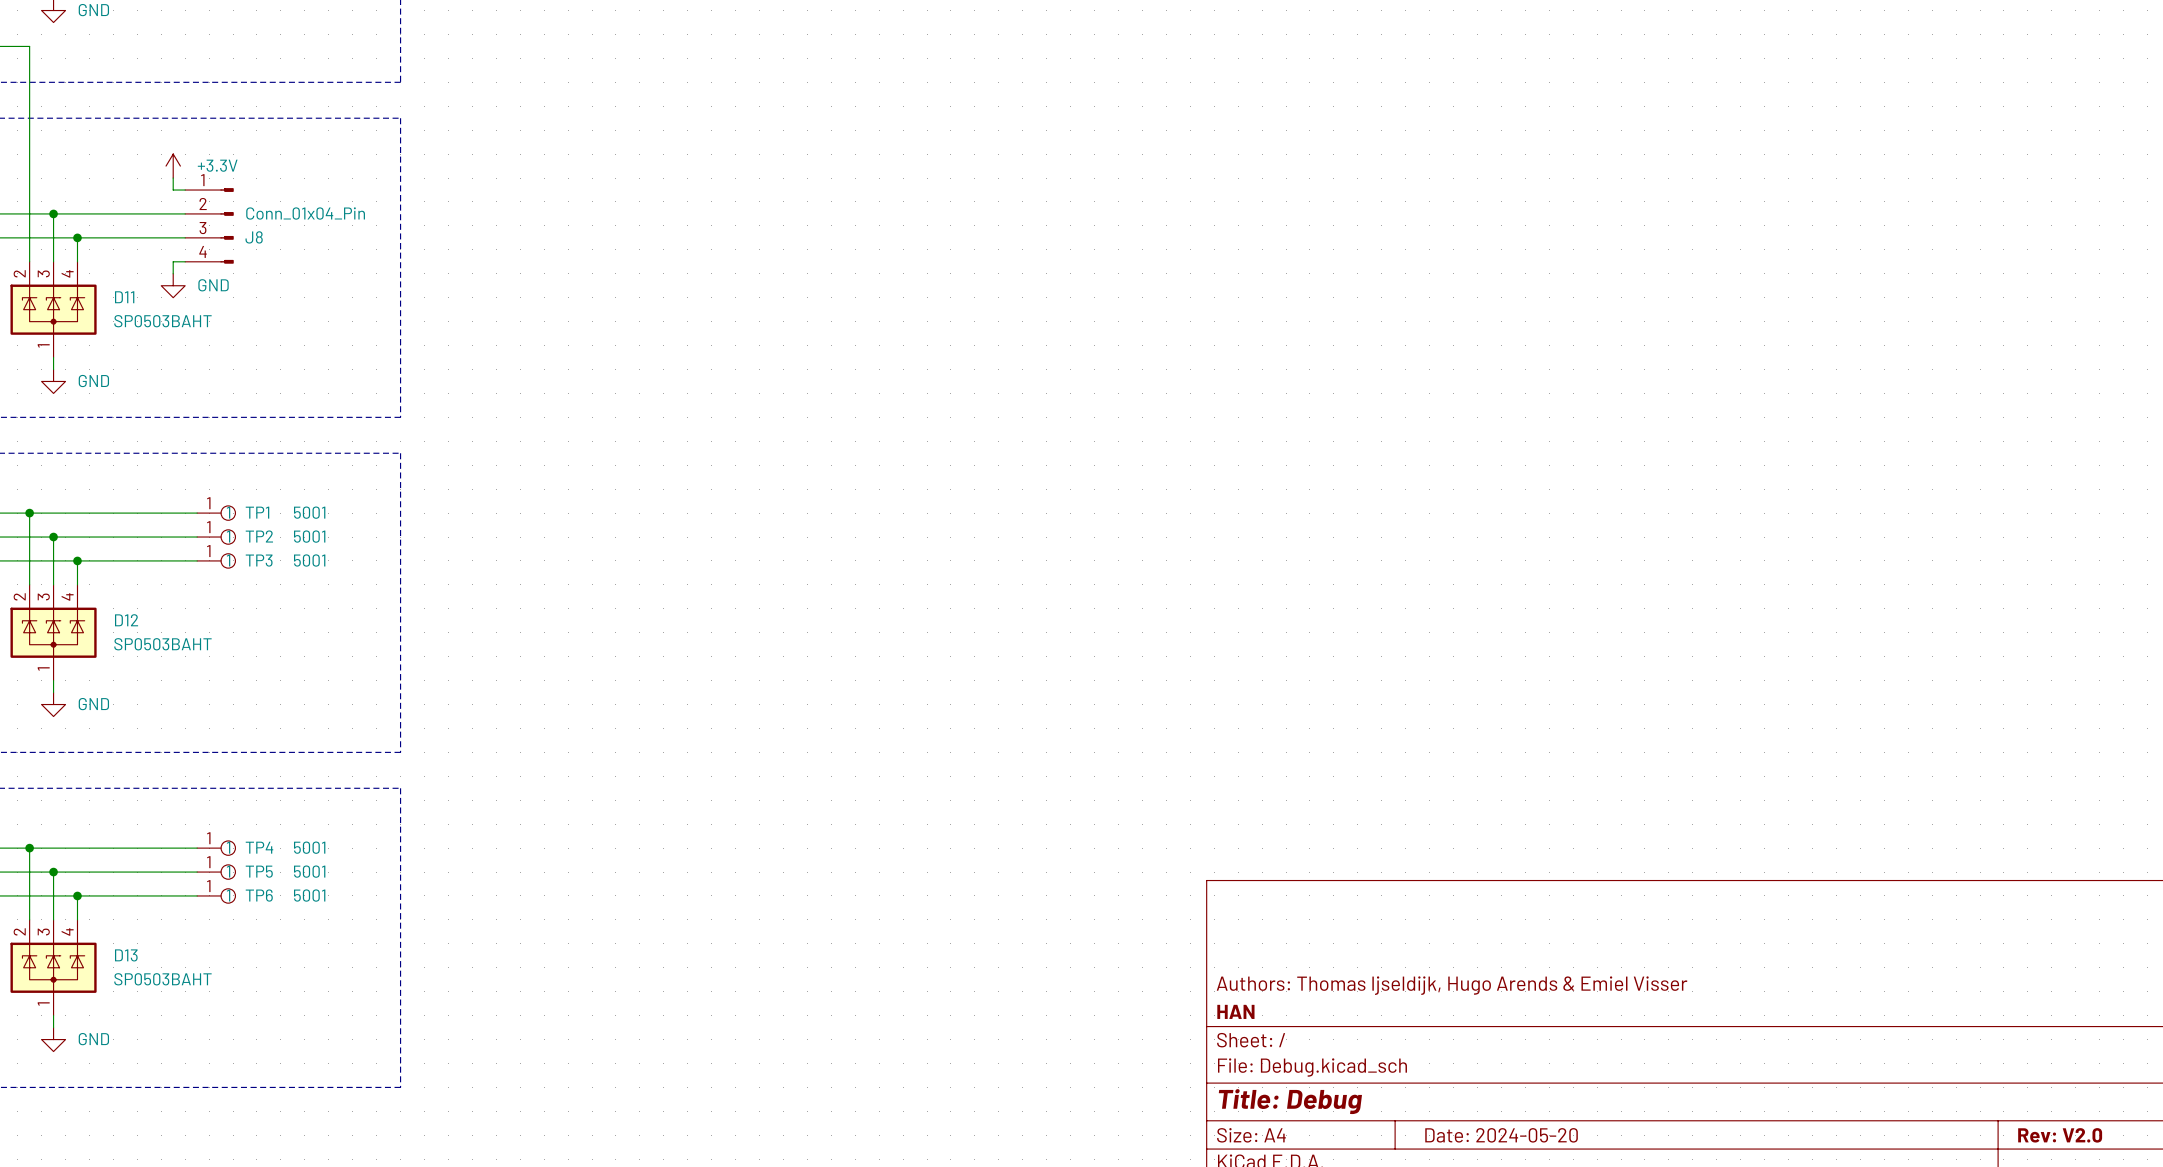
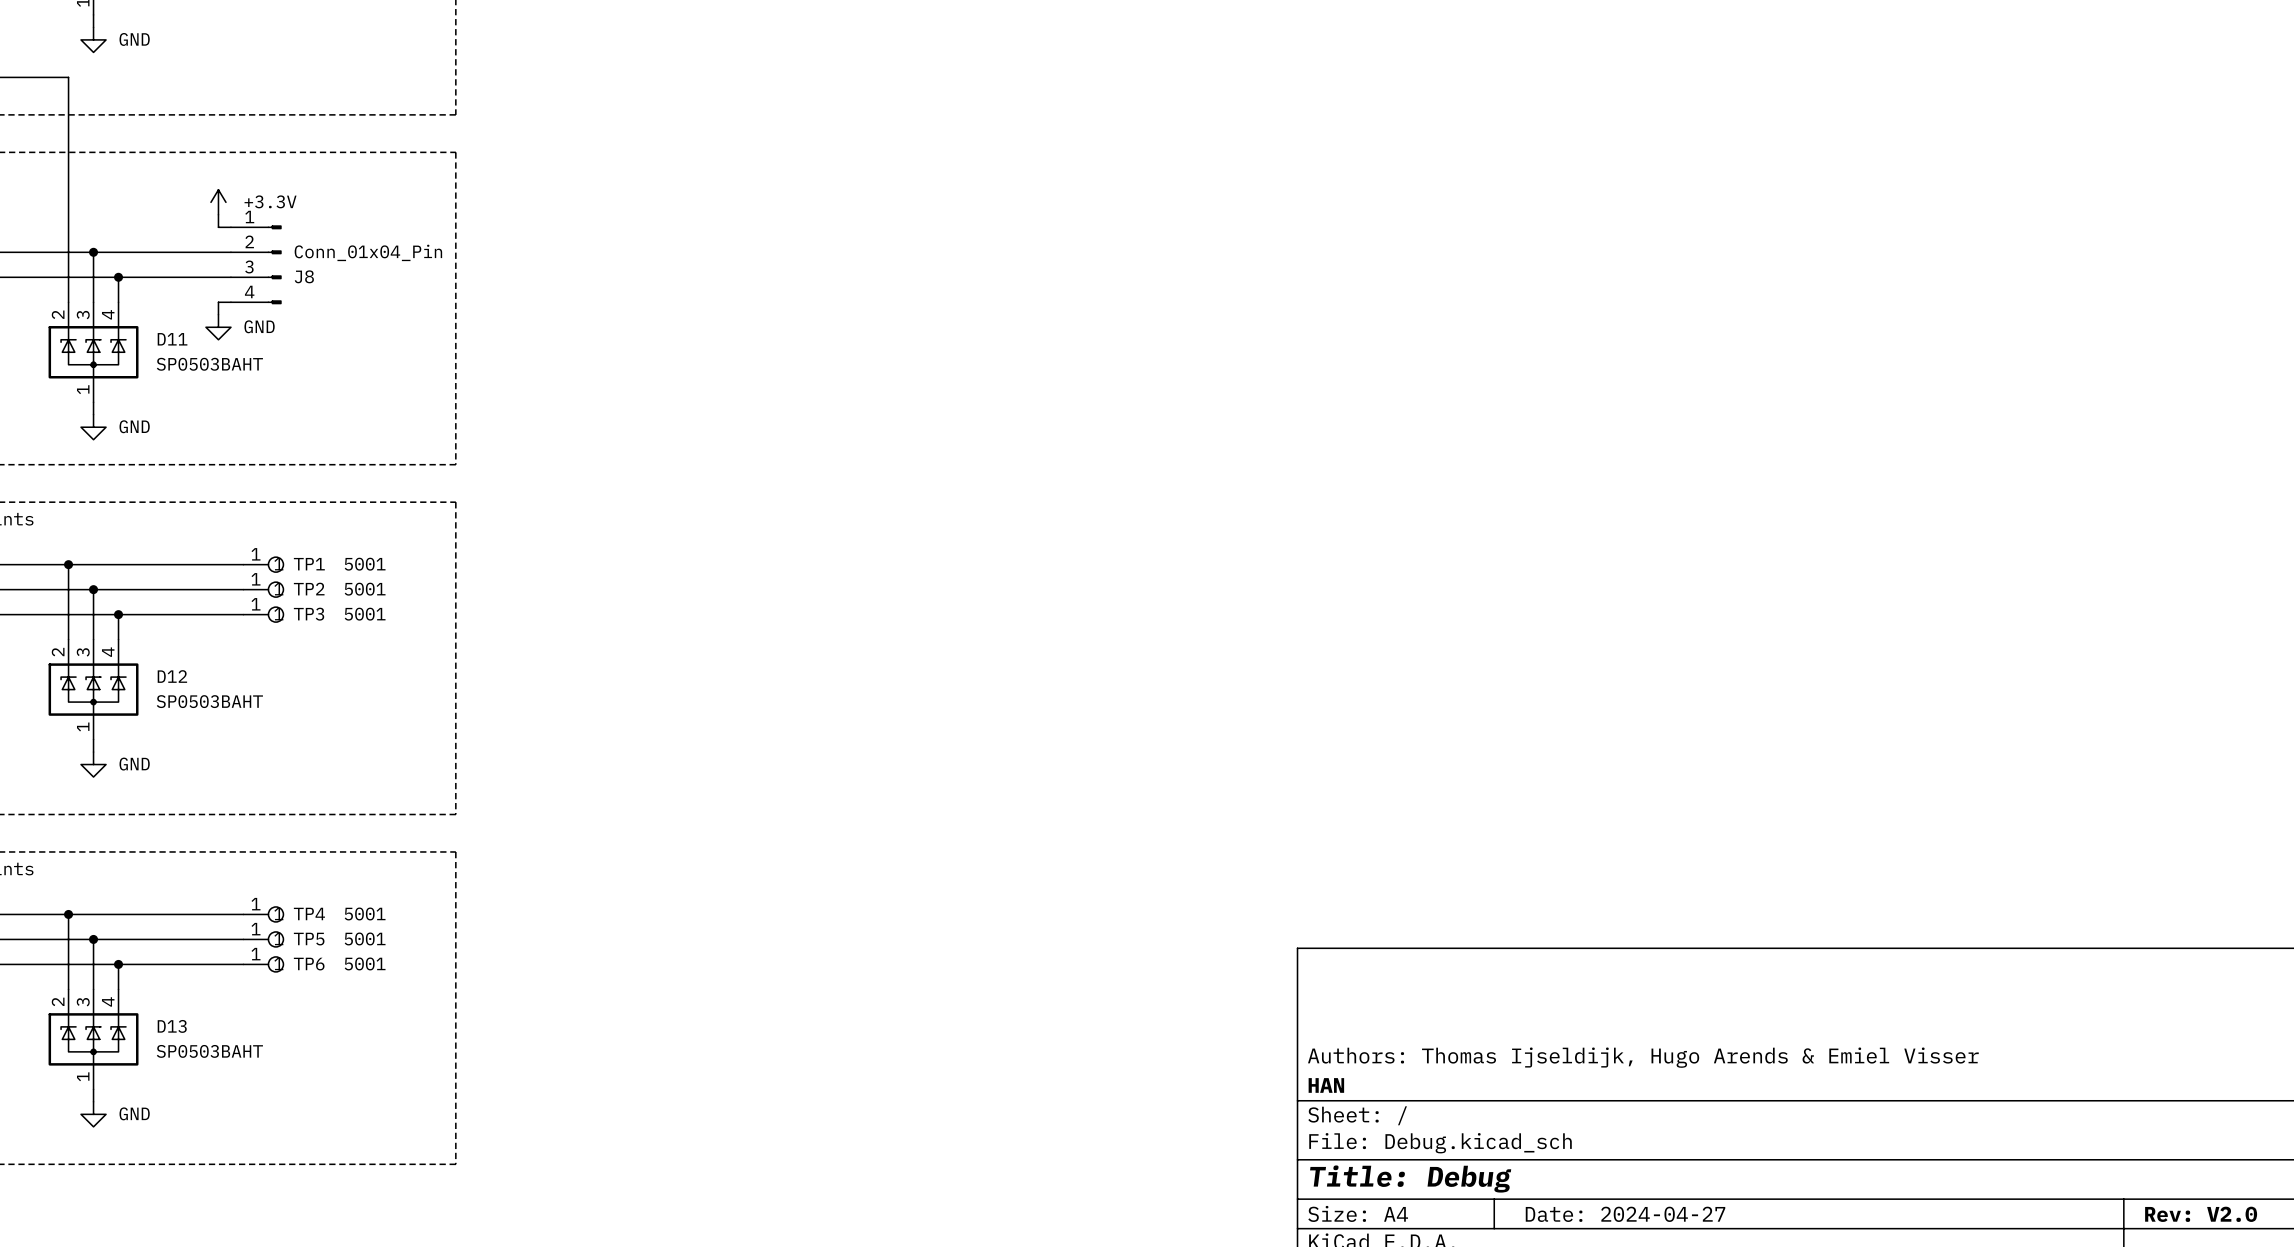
title block: Date: 2024-05-20 (1501, 1135) -> Date: 2024-04-27 (1625, 1214)

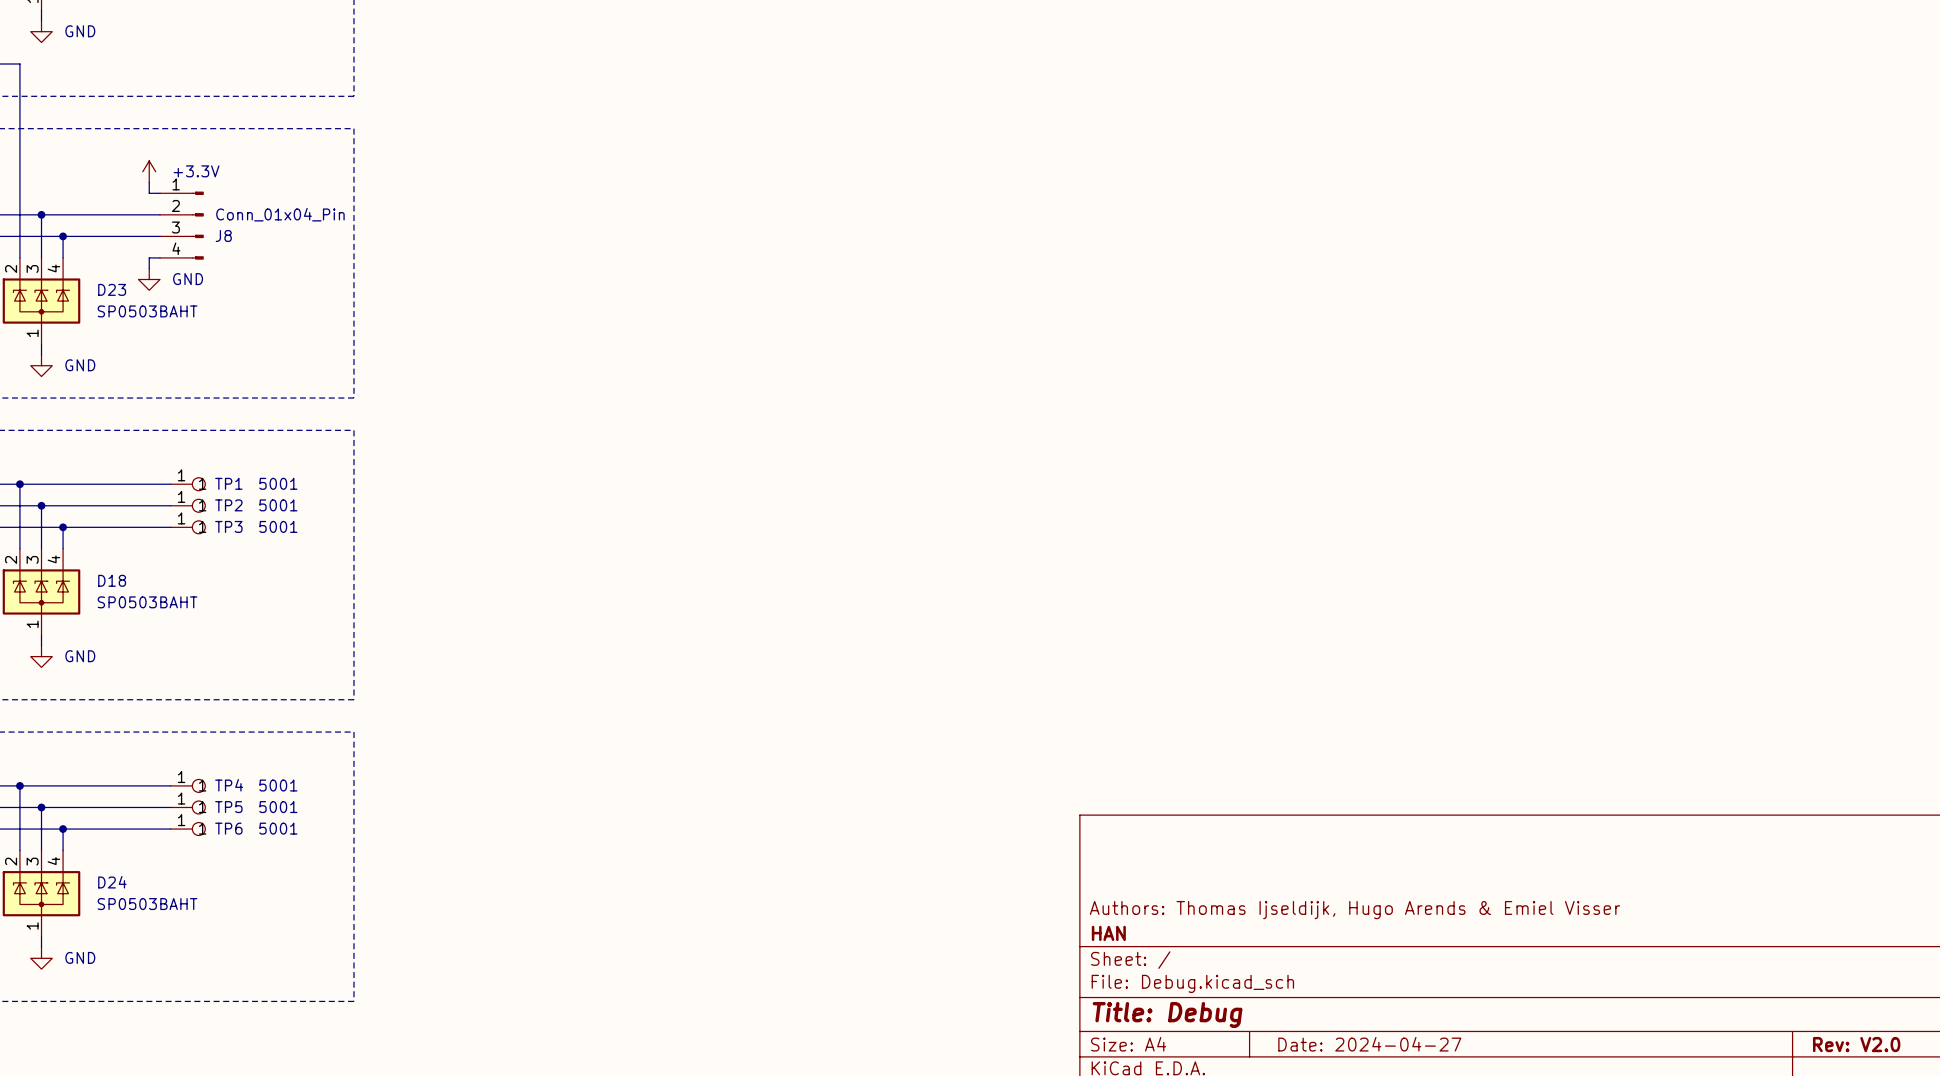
D11 name: D11 (172, 339) -> D23 (112, 289)
D12 name: D12 (172, 676) -> D18 (112, 580)
D13 name: D13 (172, 1026) -> D24 (112, 882)

